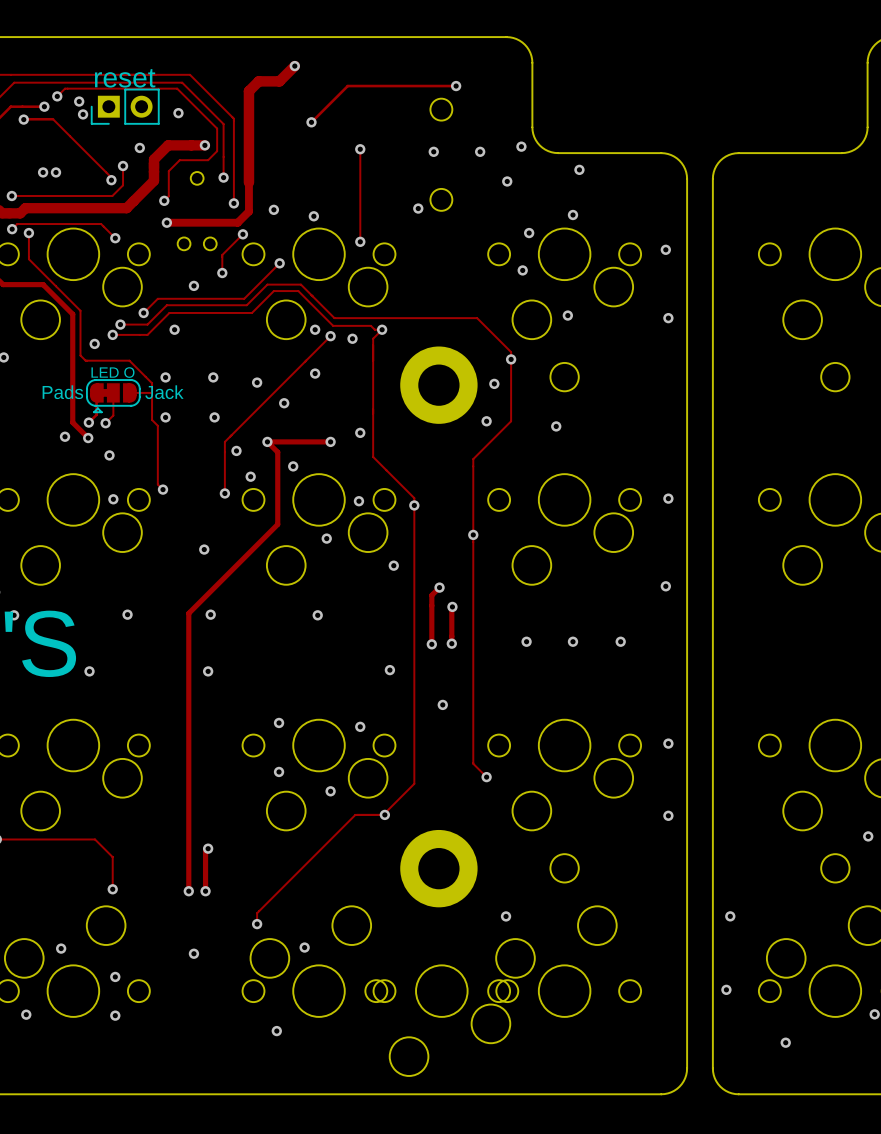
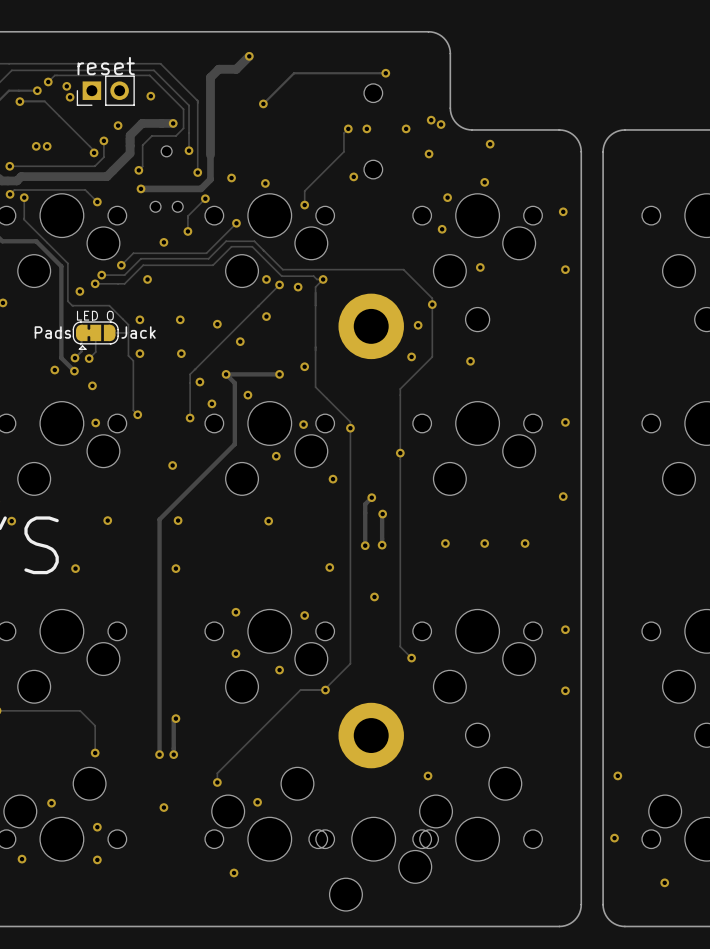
via: none -> (431, 120)
track: (360, 149) (360, 225) -> (348, 128) (343, 133) (343, 151) (304, 191)
via position: (360, 149) -> (348, 128)

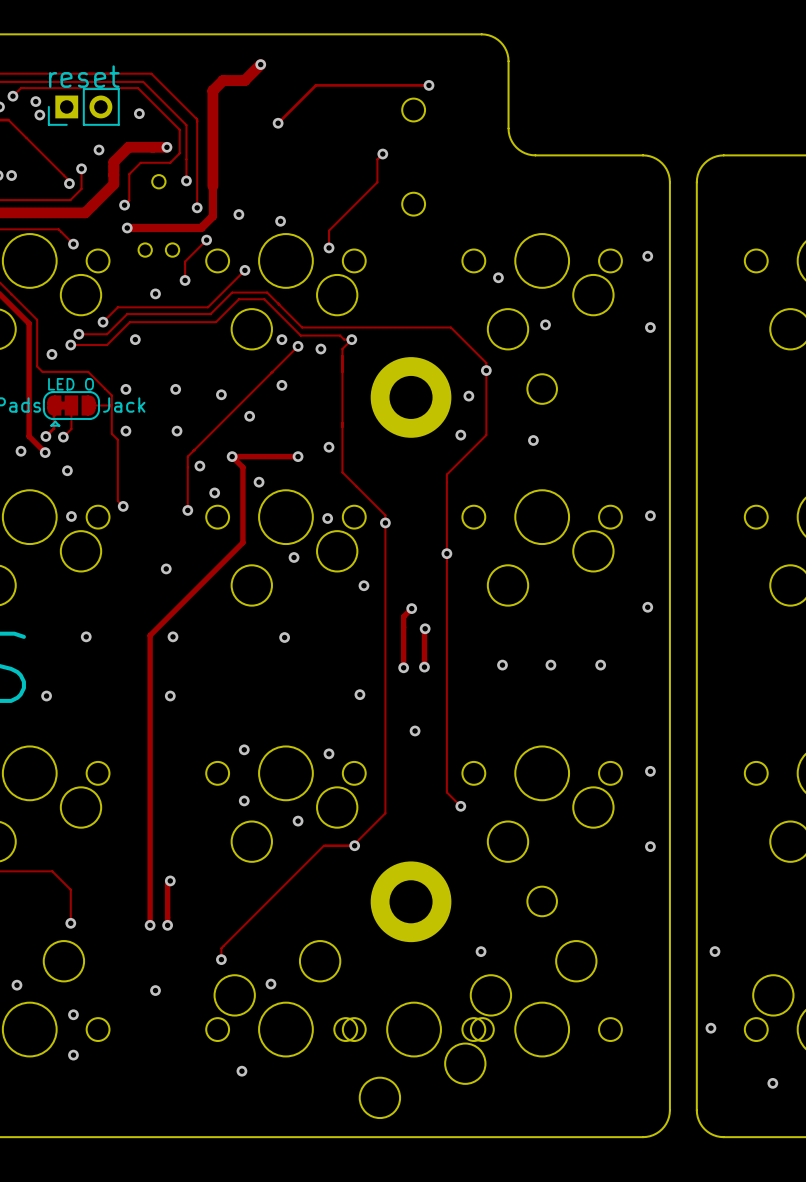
via: (431, 120) -> none
via: (441, 124) -> none
via: (366, 128) -> none
via: (406, 128) -> none
via: (490, 144) -> none
via: (429, 153) -> none
via: (353, 176) -> none
via: (484, 182) -> none
via: (447, 197) -> none

